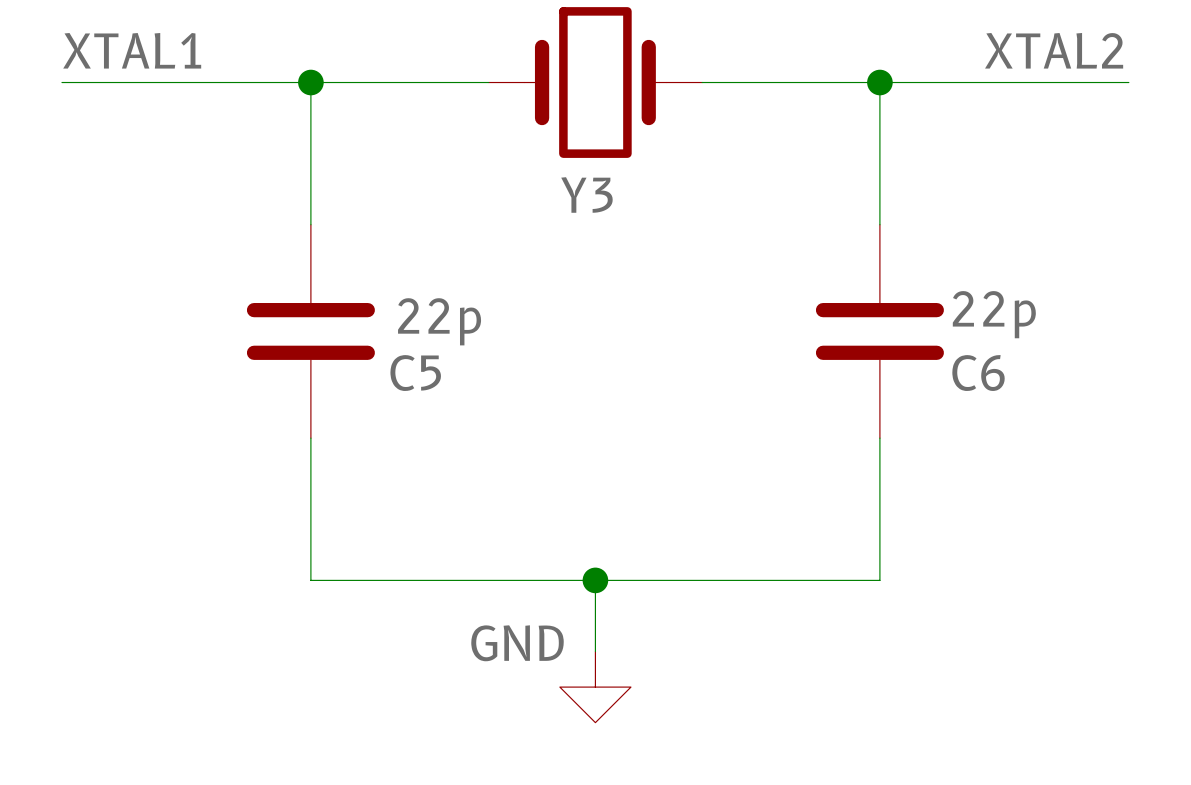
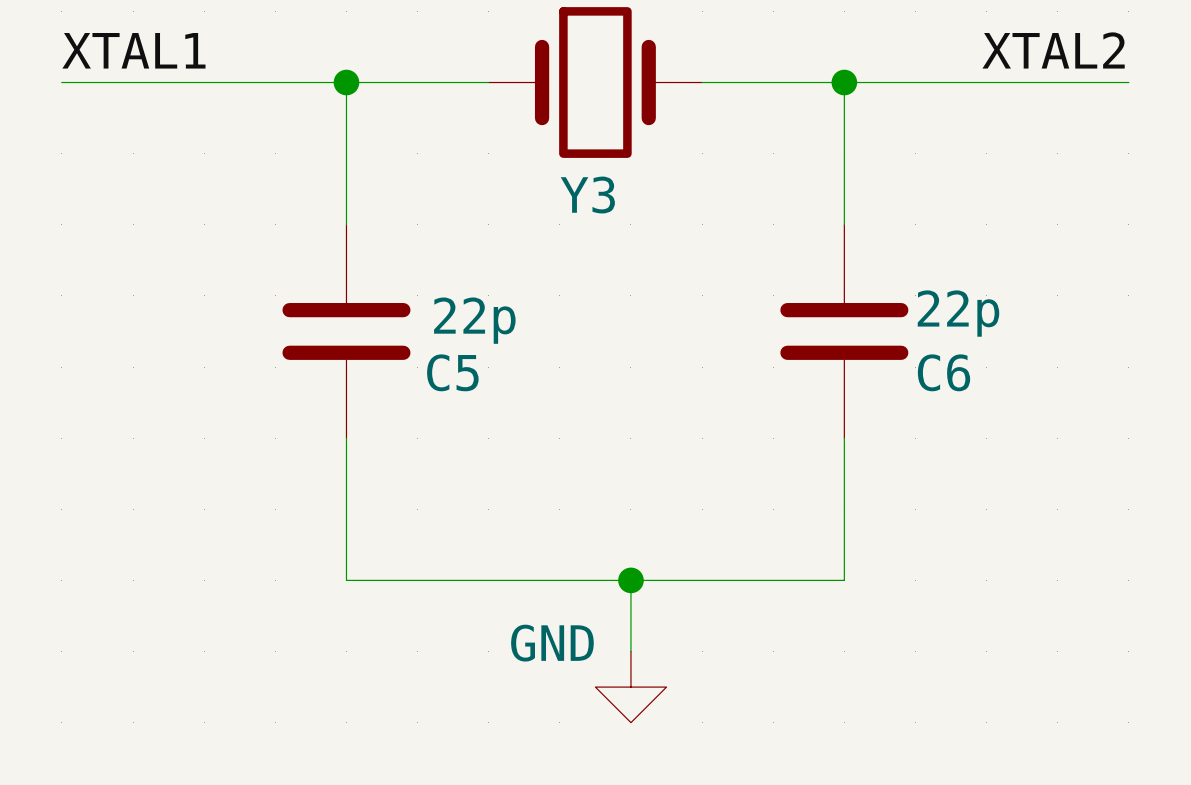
wire: (310, 82) (310, 224) -> (346, 82) (346, 224)
junction position: (310, 82) -> (346, 82)
wire: (879, 82) (879, 224) -> (844, 82) (844, 224)
junction position: (879, 82) -> (844, 82)
C5 position: (310, 331) -> (346, 331)
C6 position: (879, 331) -> (844, 331)
wire: (310, 438) (310, 580) (346, 580) -> (346, 438) (346, 580)
wire: (879, 438) (879, 580) (844, 580) -> (844, 438) (844, 580)
wire: (595, 580) (595, 651) -> (630, 580) (630, 651)
junction position: (595, 580) -> (630, 580)
power symbol position: GND (595, 687) -> GND (630, 687)

